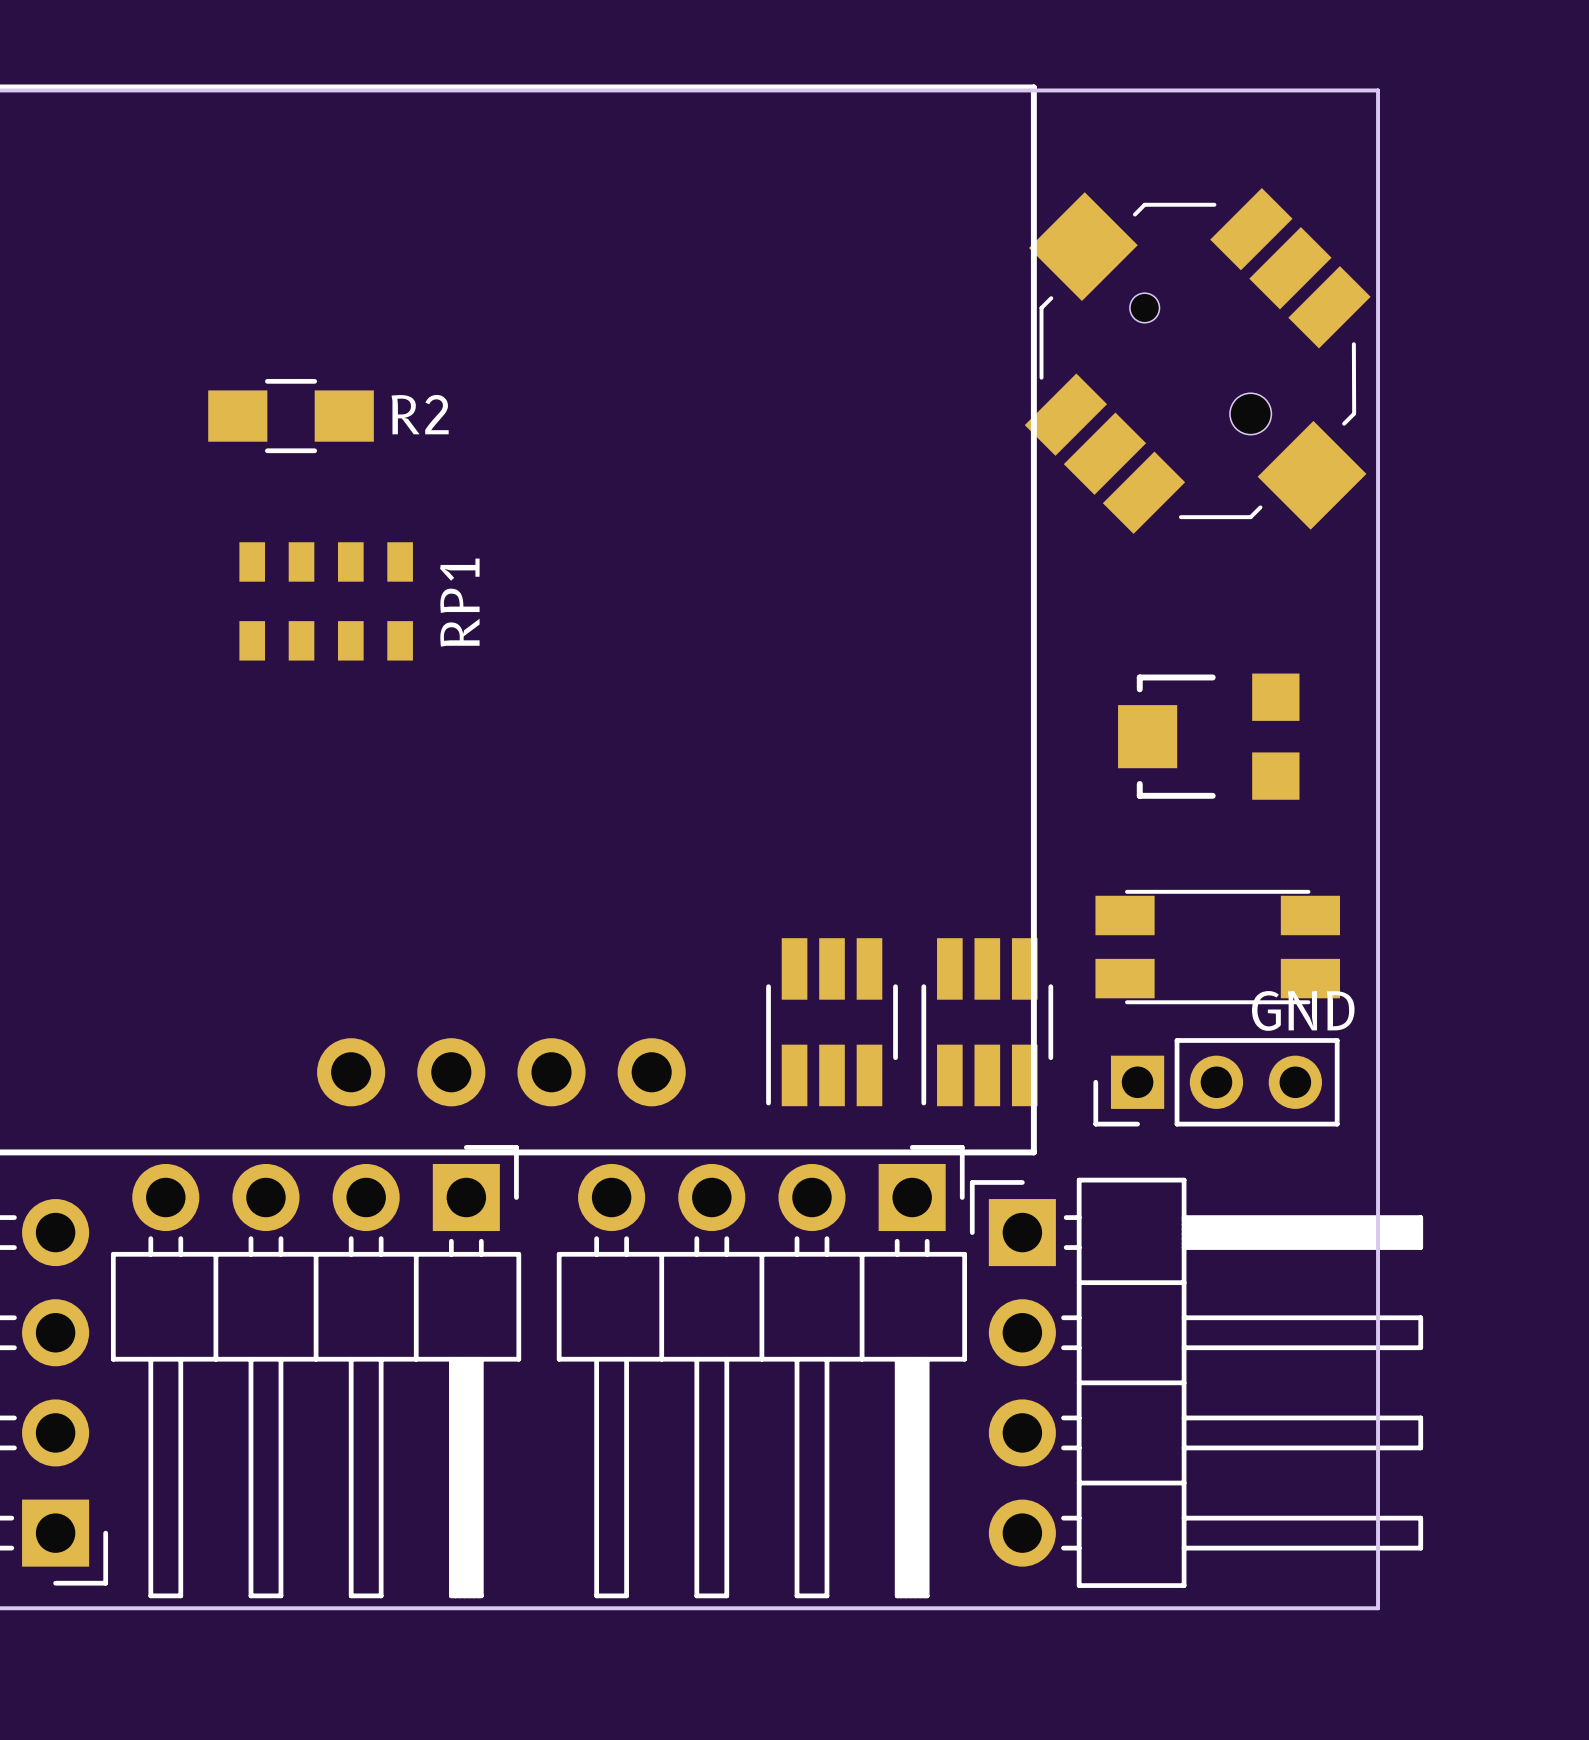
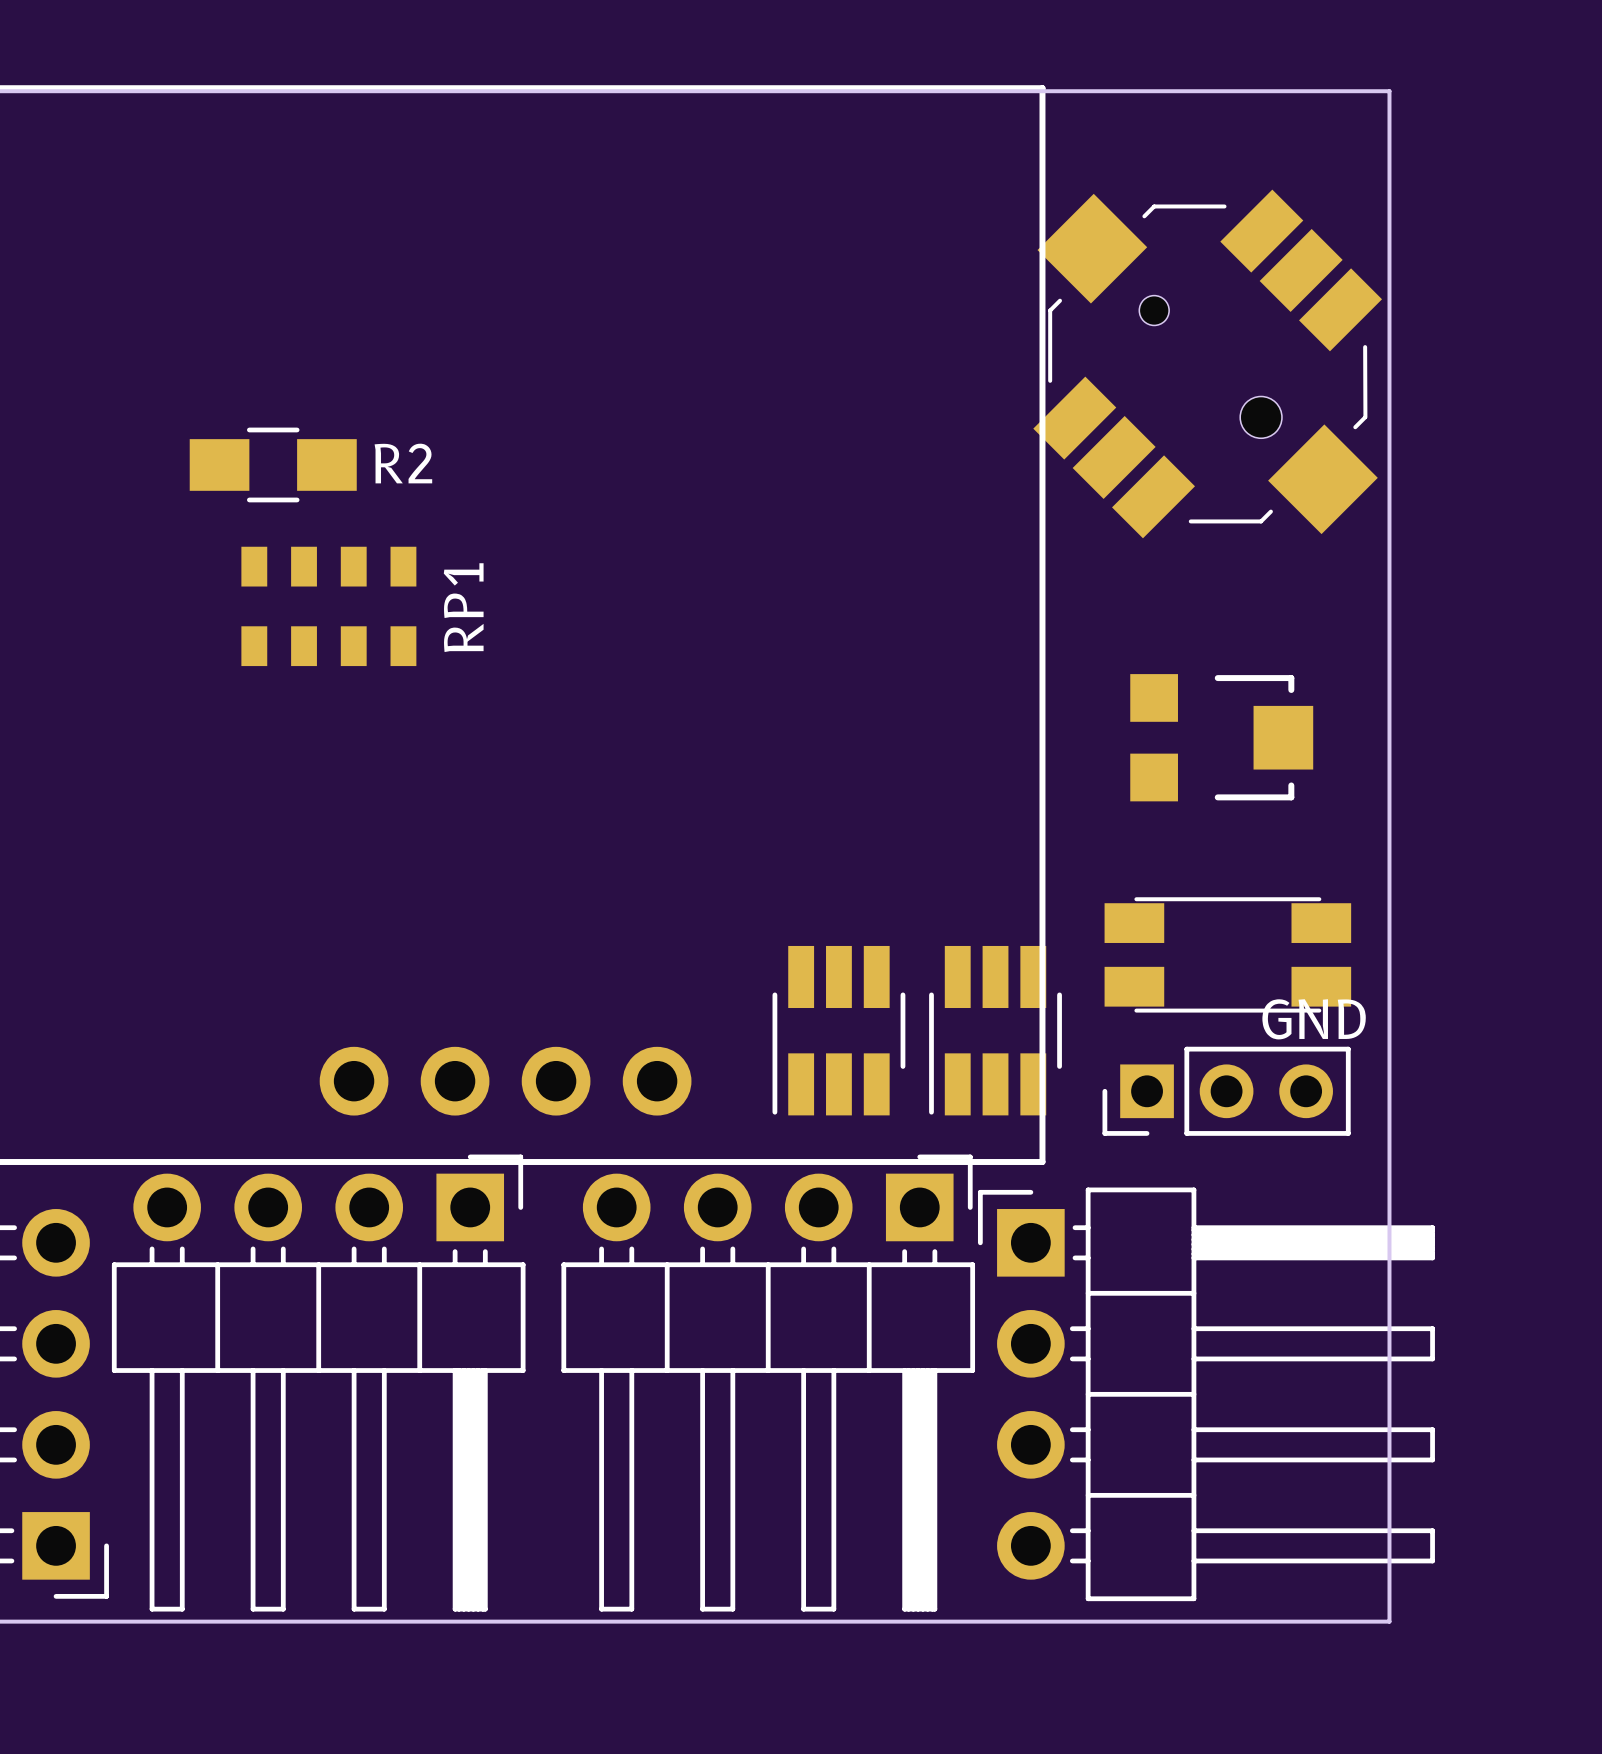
R2 position: (291, 416) -> (273, 464)
part rotation: 0° (1208, 736) -> 180° (1221, 737)

